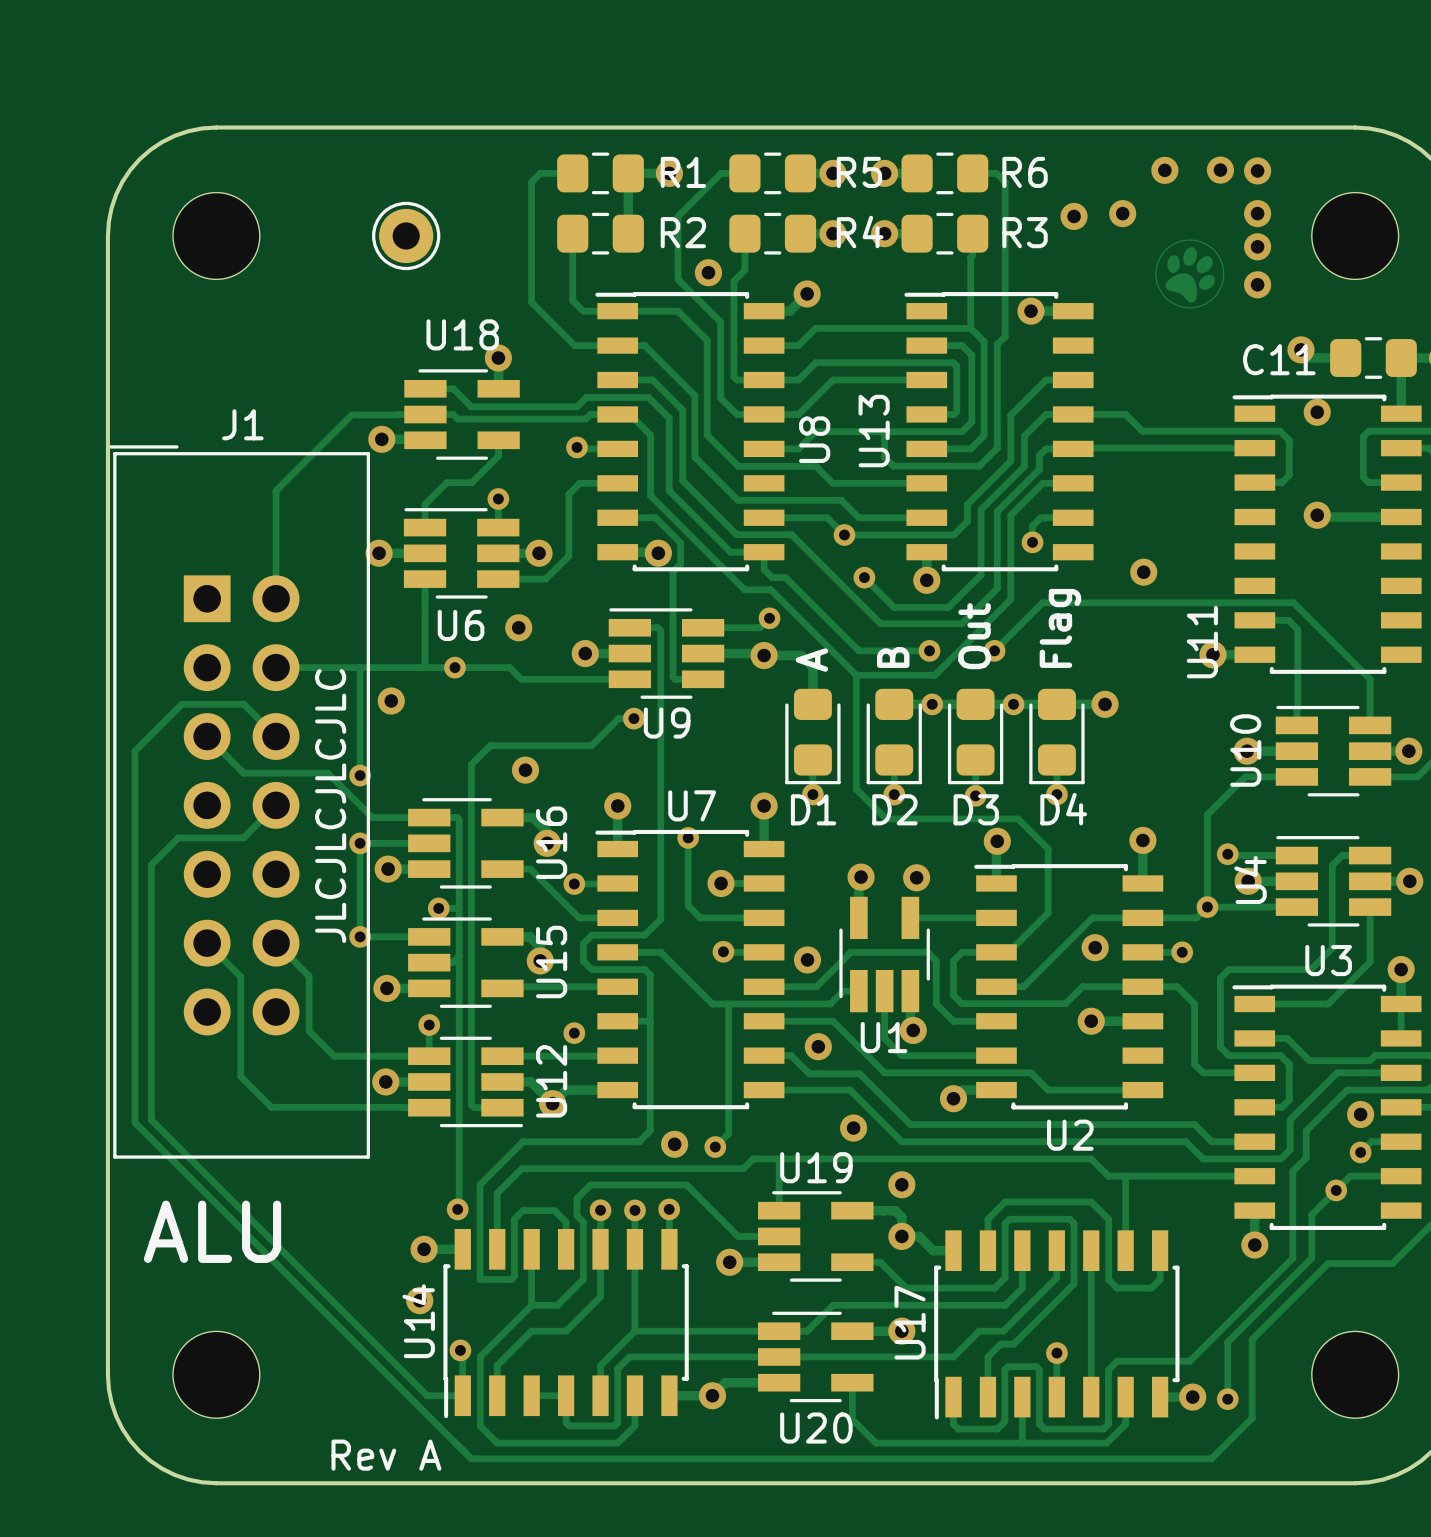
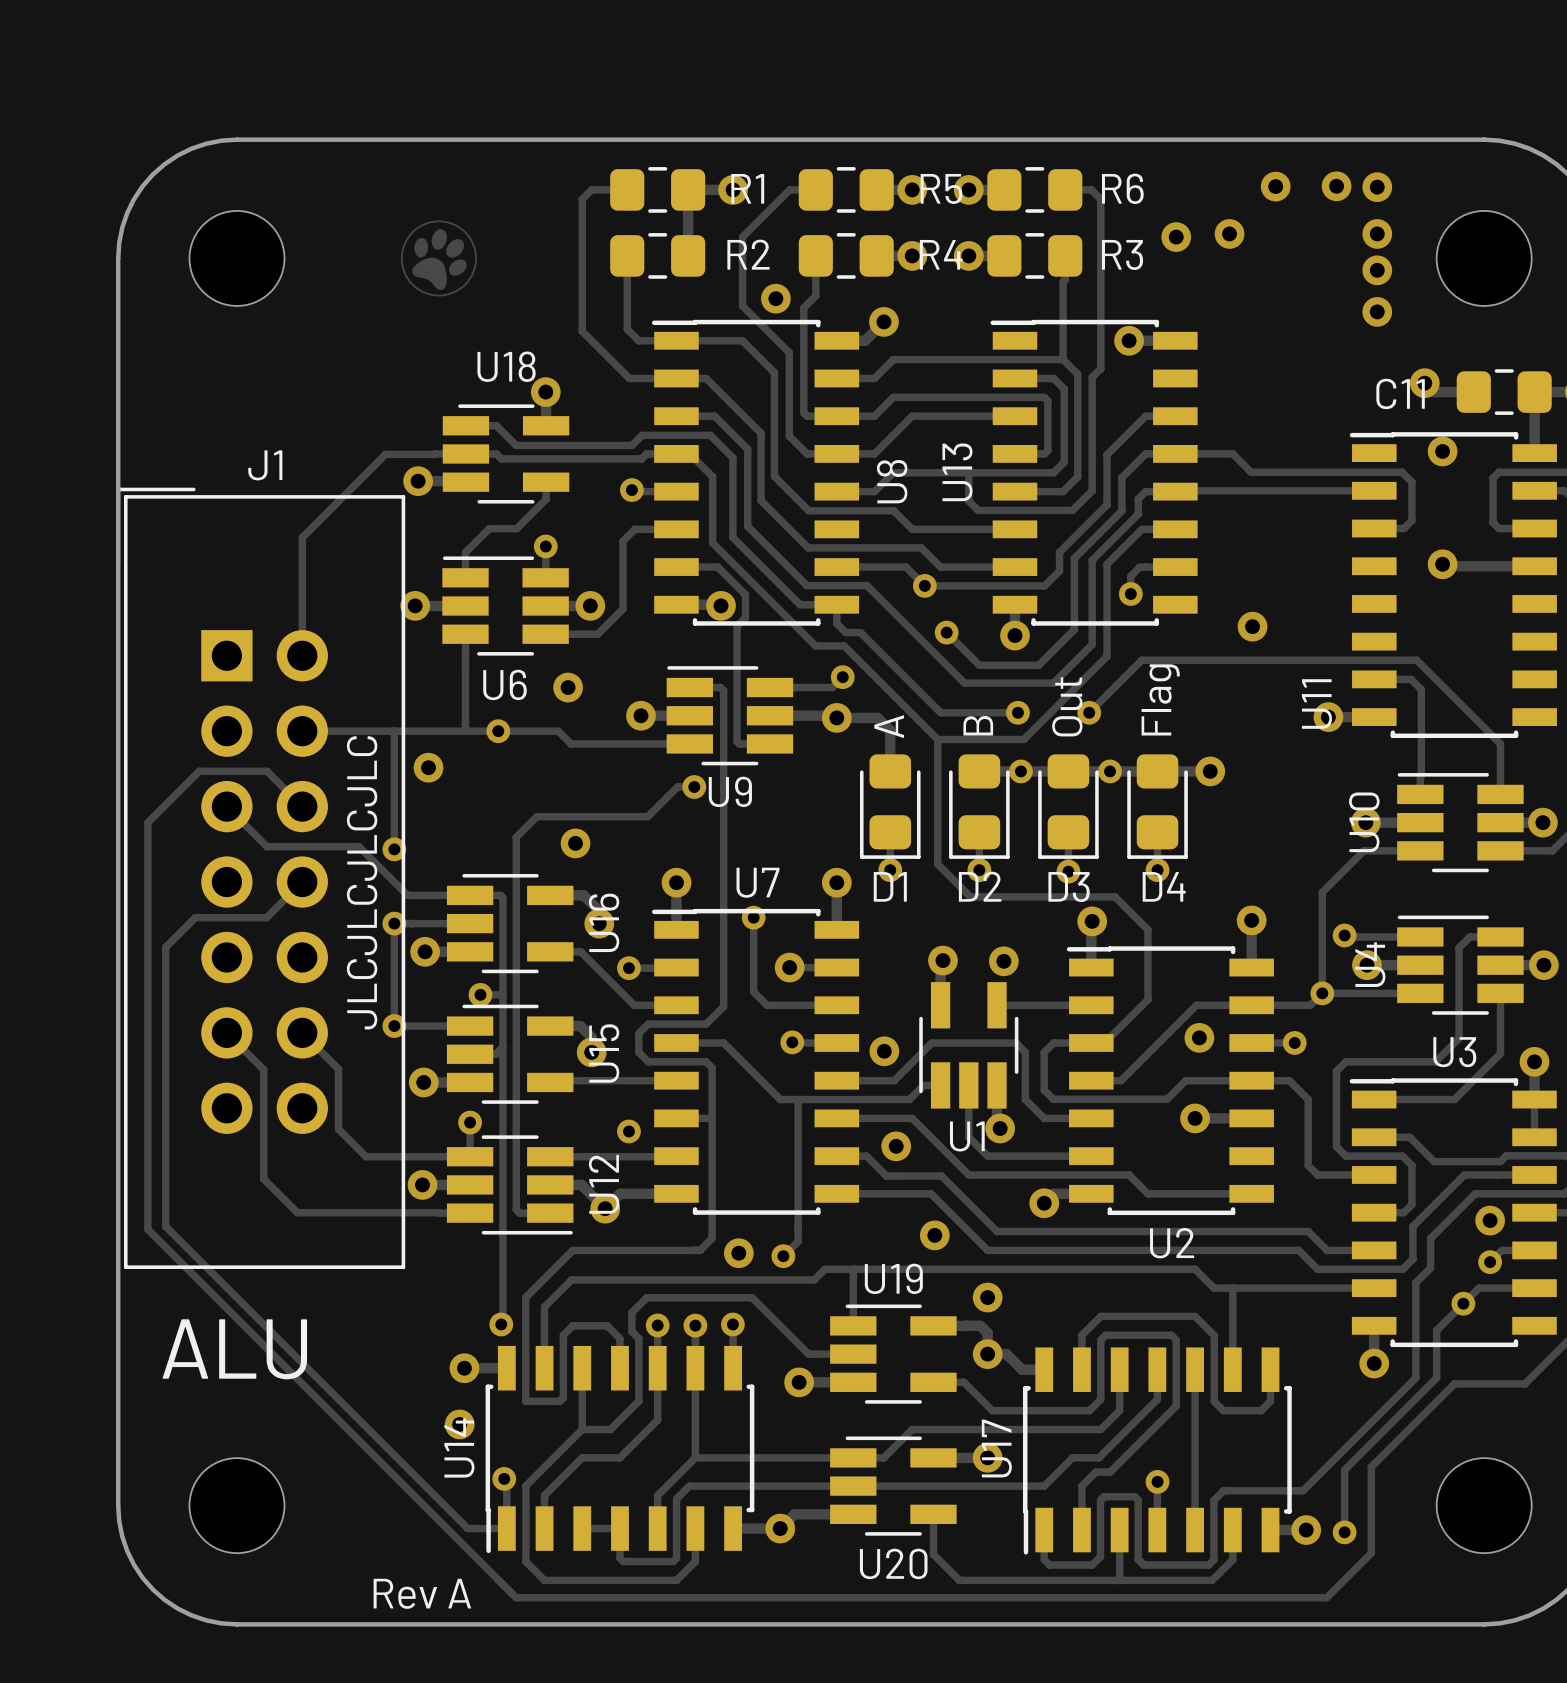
drawing: none -> [401, 220, 477, 297]
part: (406, 235) -> none
drawing: [1155, 239, 1225, 309] -> none

